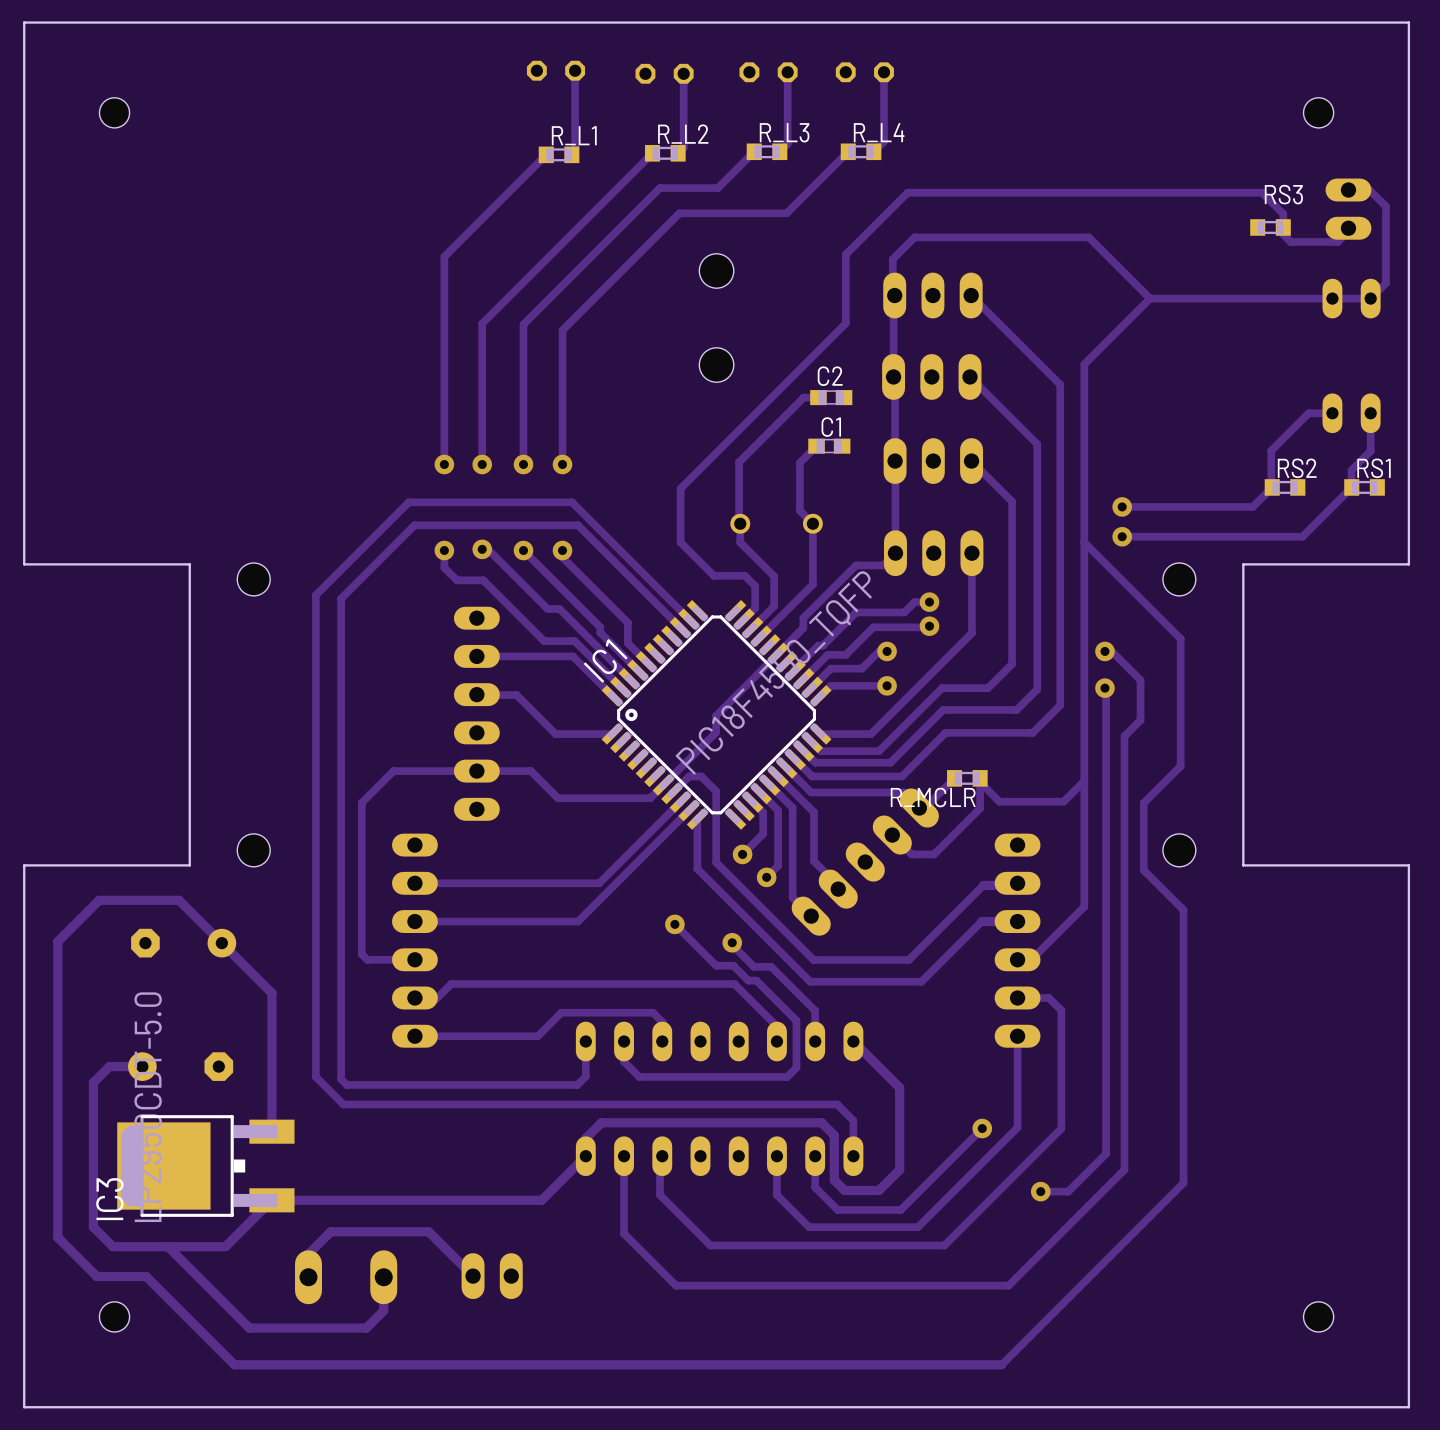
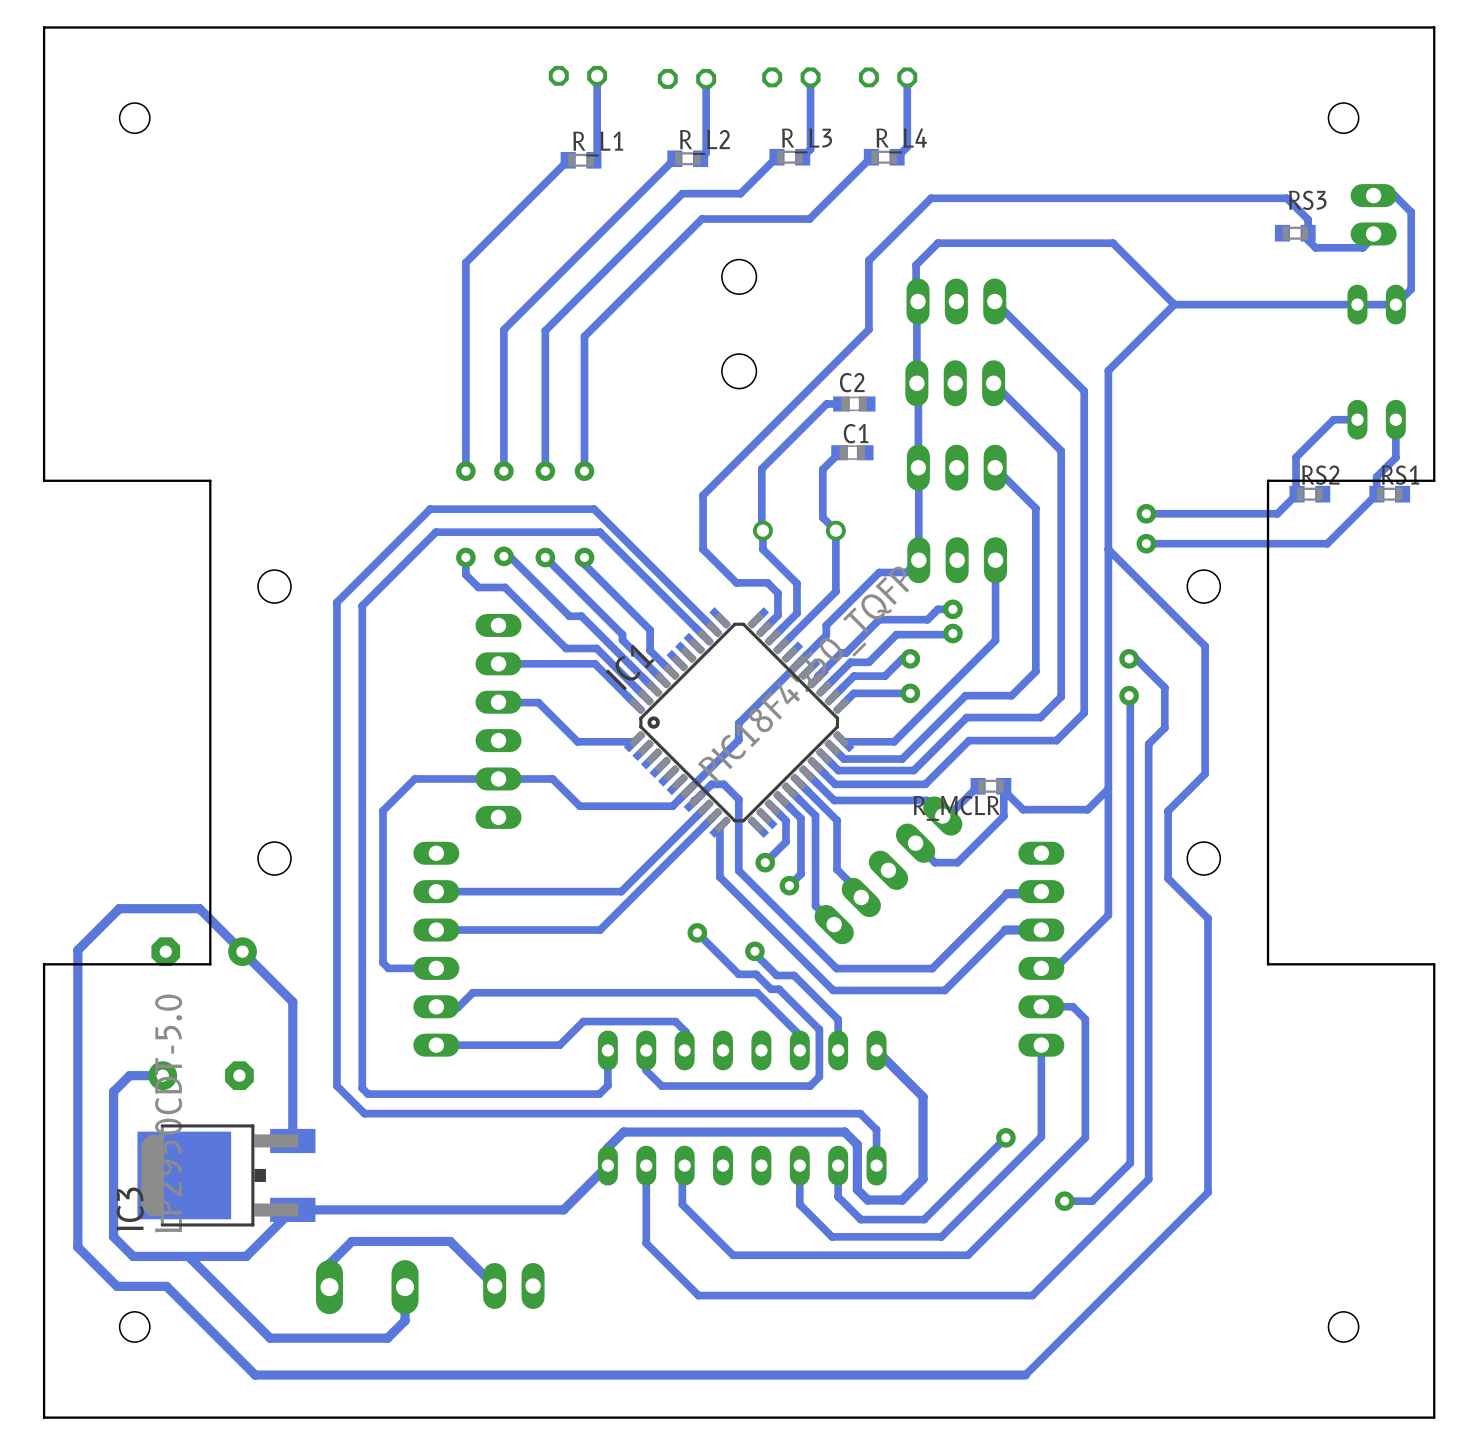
board edge: (24, 474) (24, 564) (189, 564) -> (44, 480) (210, 480) (210, 571)
board edge: (1408, 474) (1408, 564) (1243, 564) -> (1434, 480) (1268, 480) (1268, 571)
board edge: (189, 865) (24, 865) (24, 955) -> (210, 873) (210, 964) (44, 964)
board edge: (1243, 865) (1408, 865) (1408, 955) -> (1268, 873) (1268, 964) (1434, 964)

